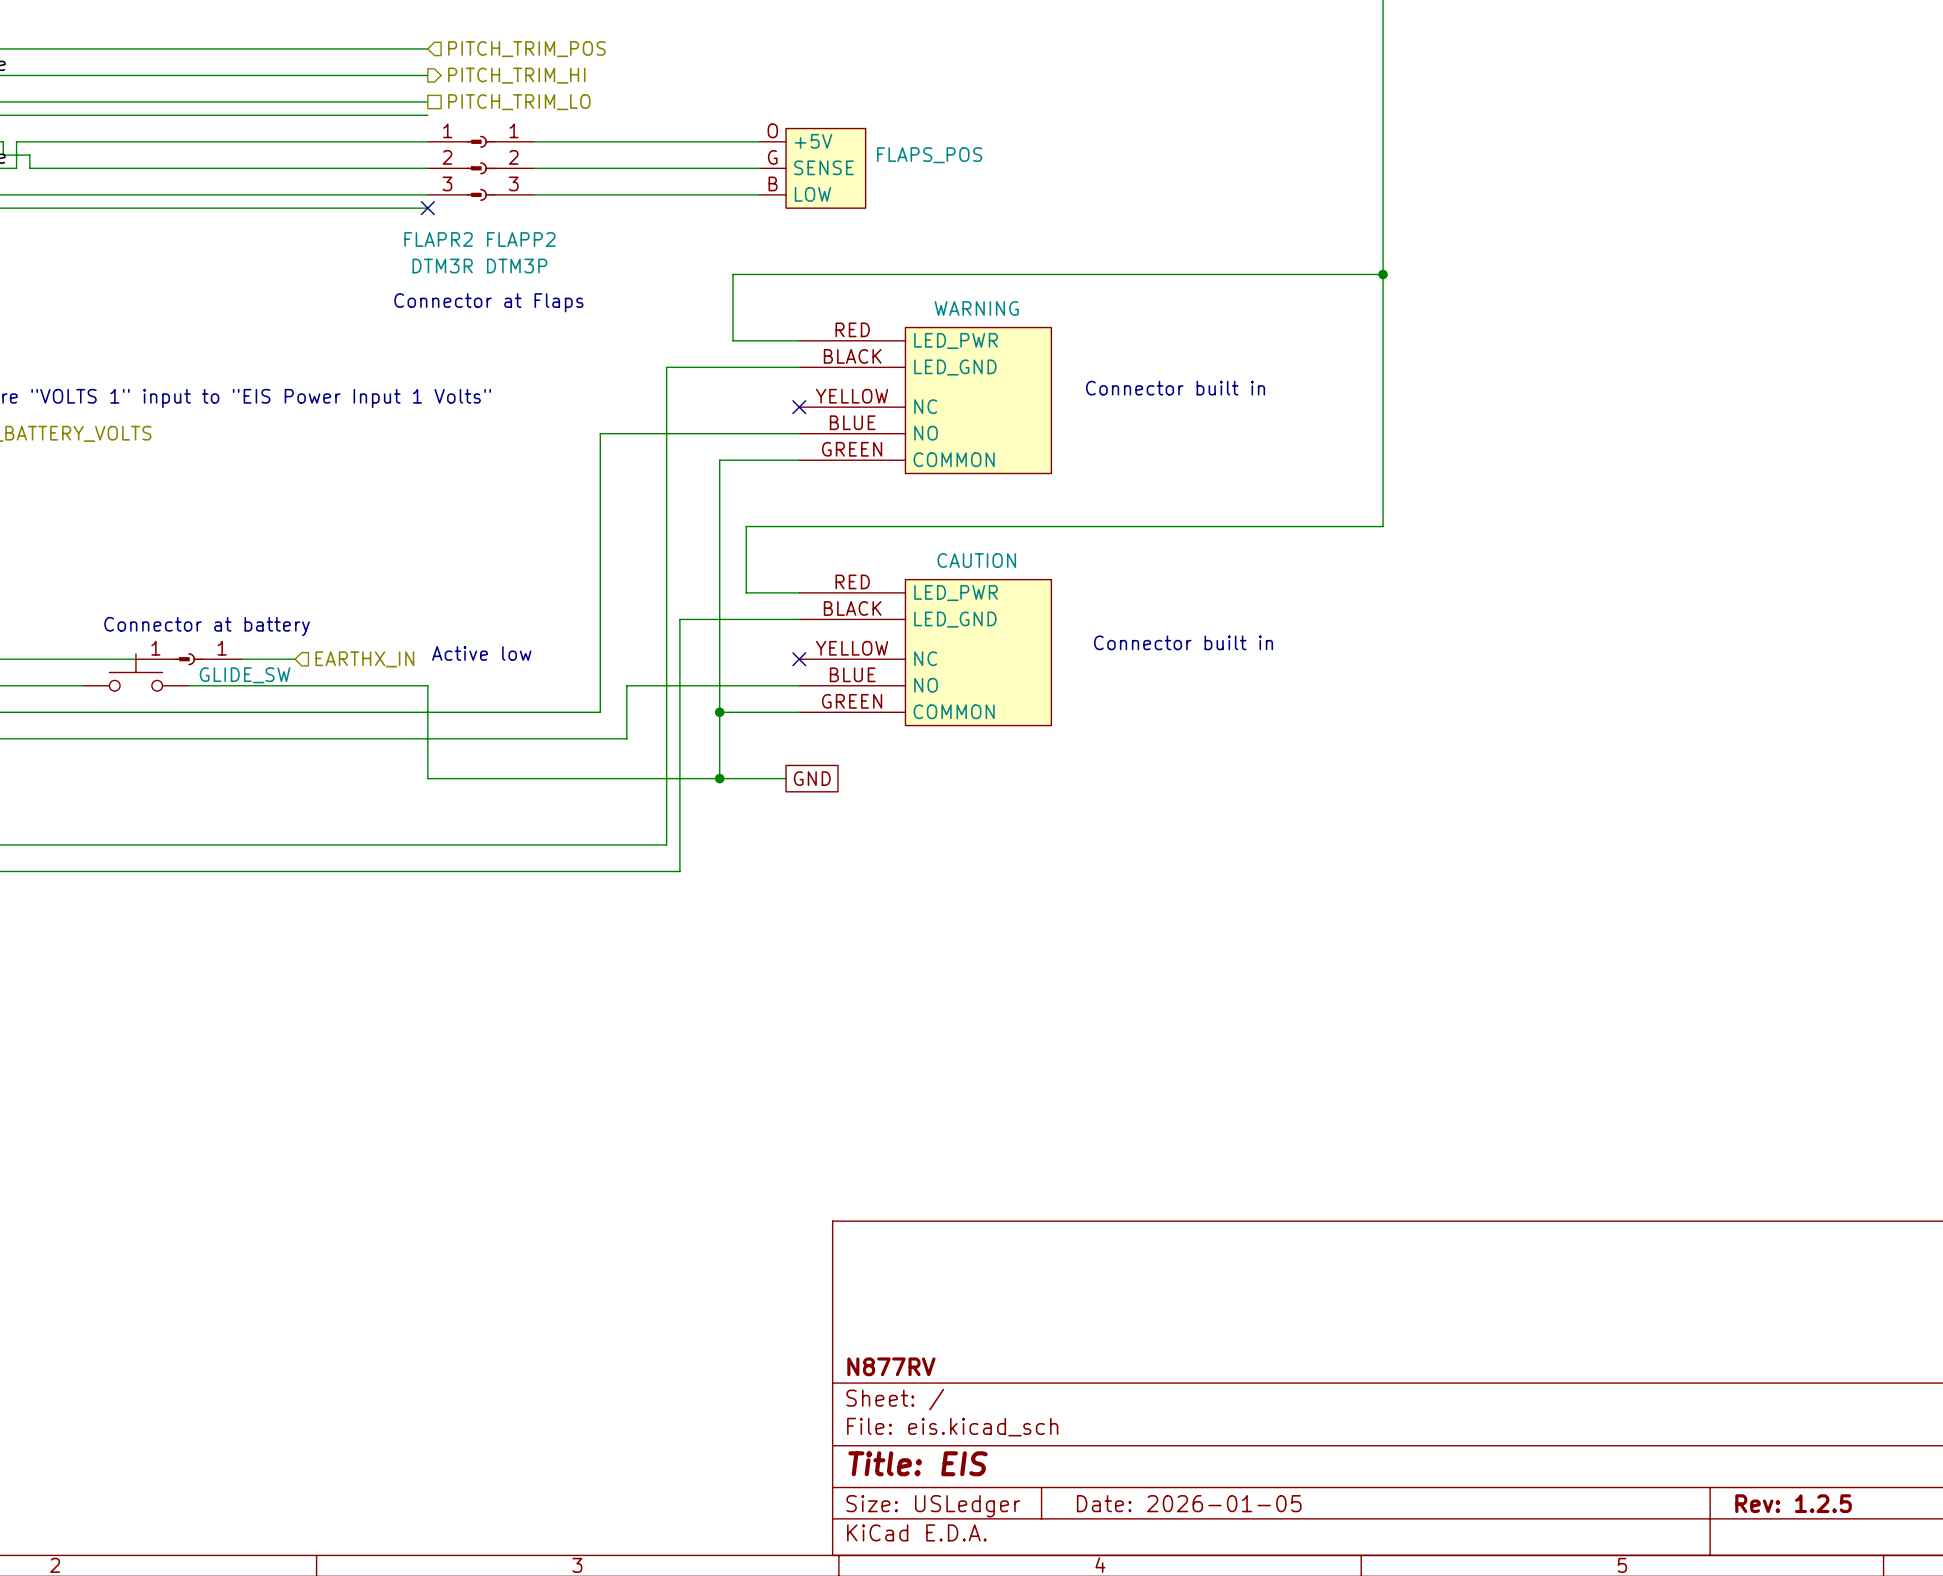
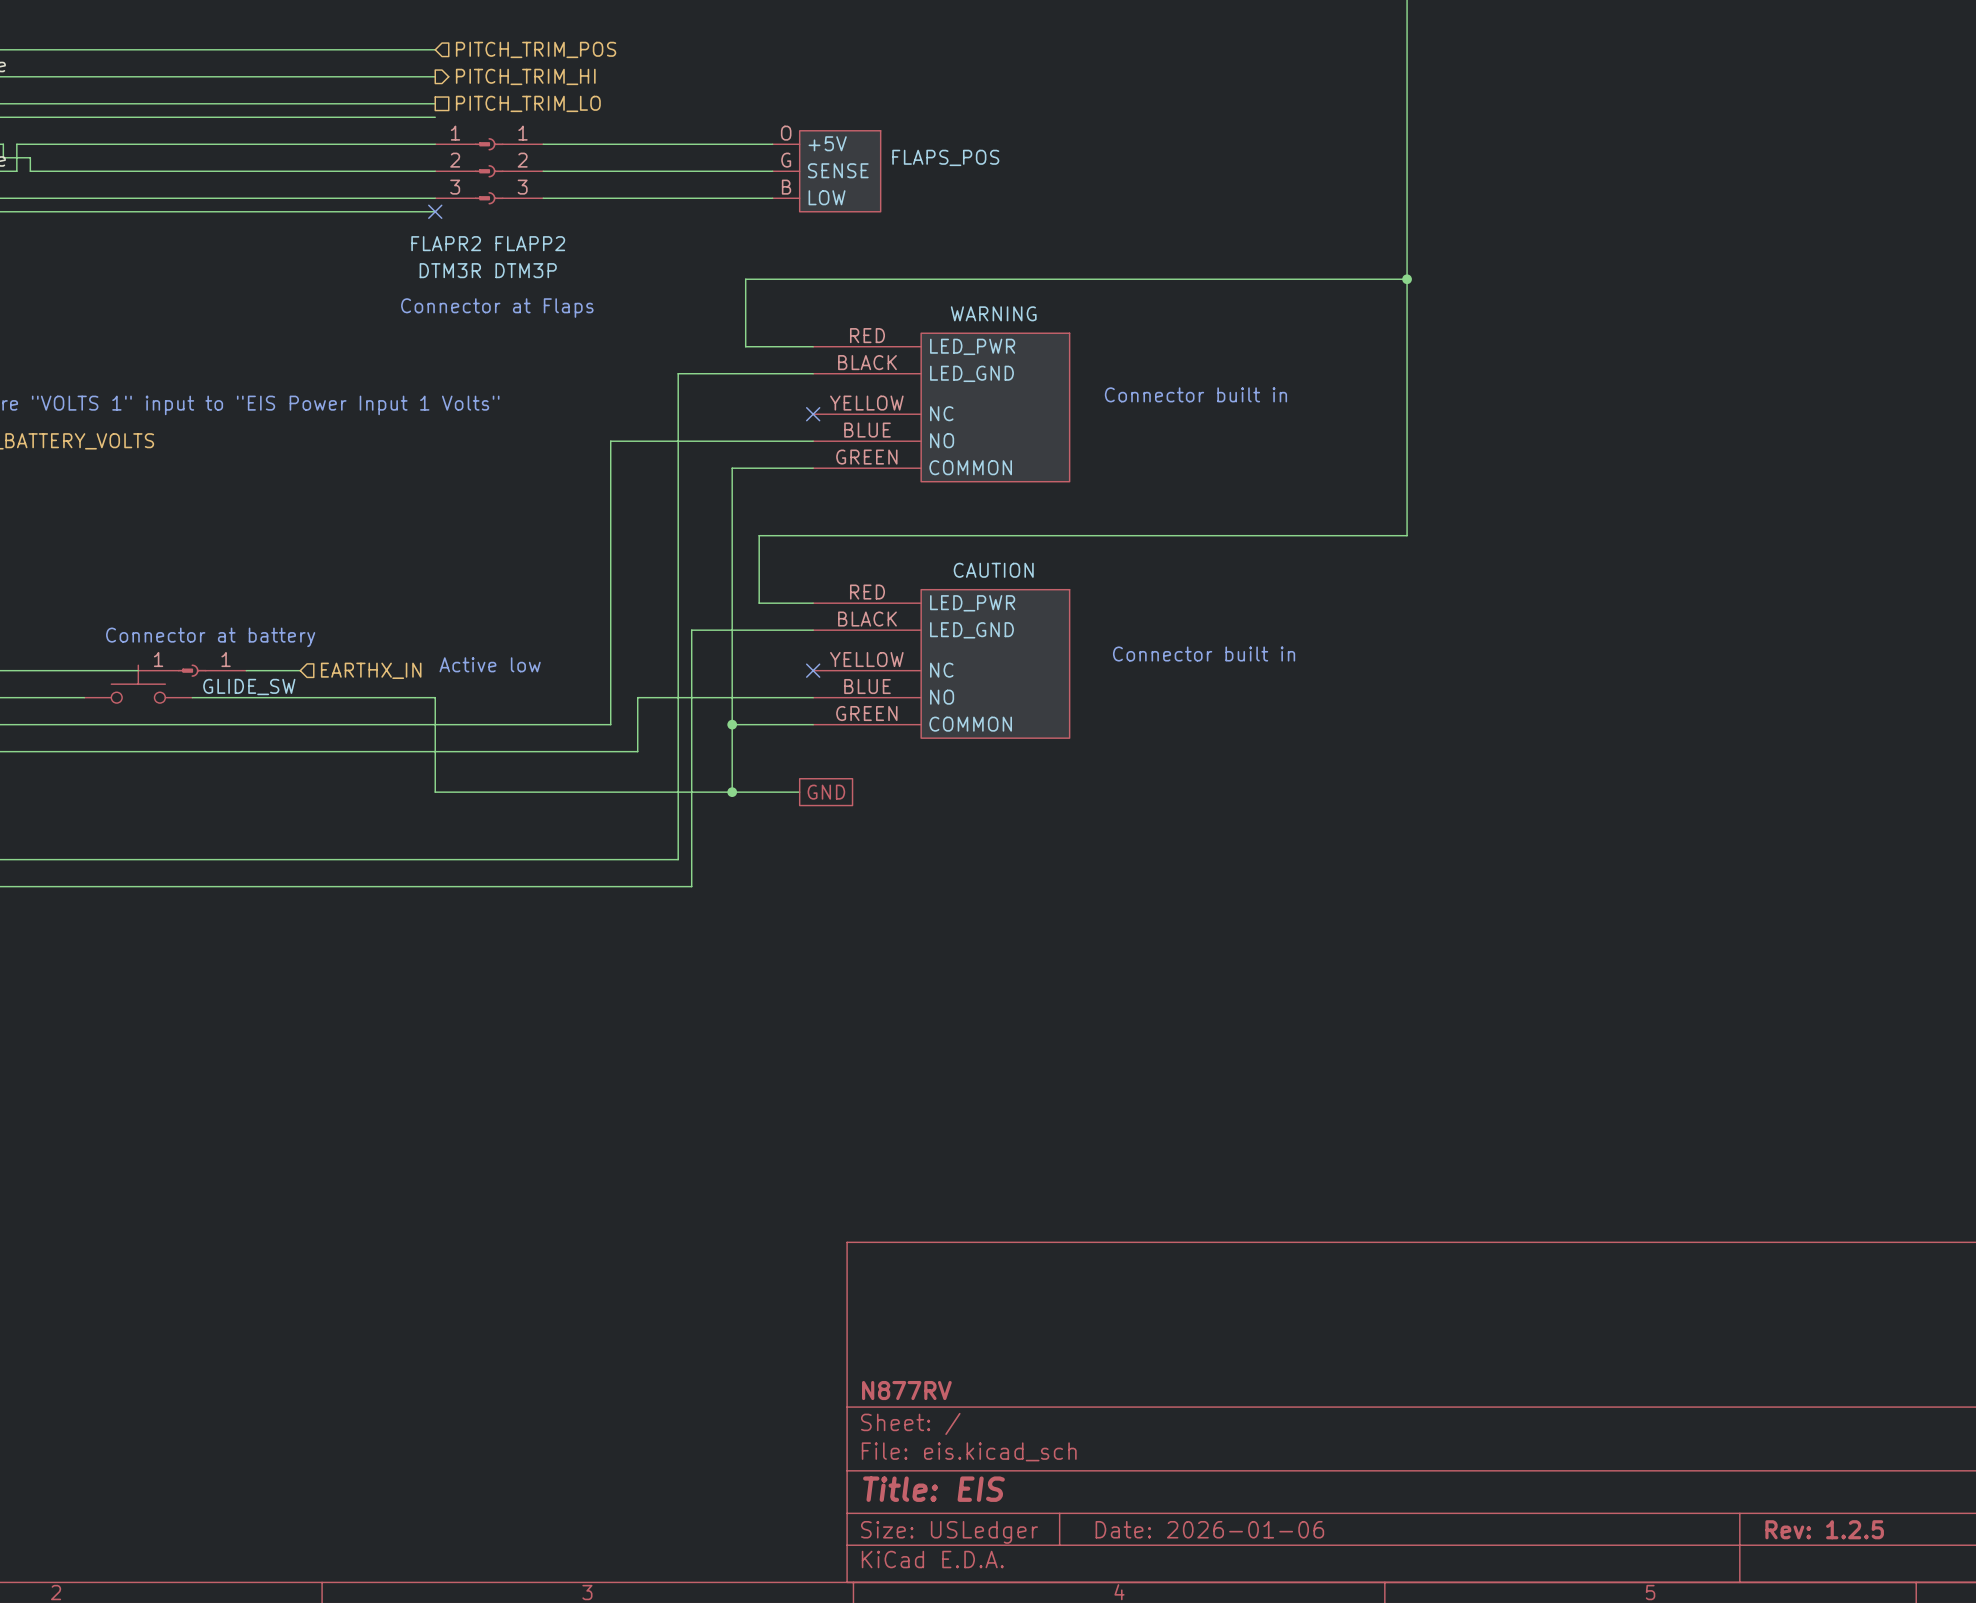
title block: Date: 2026-01-05 (1189, 1503) -> Date: 2026-01-06 (1209, 1529)

